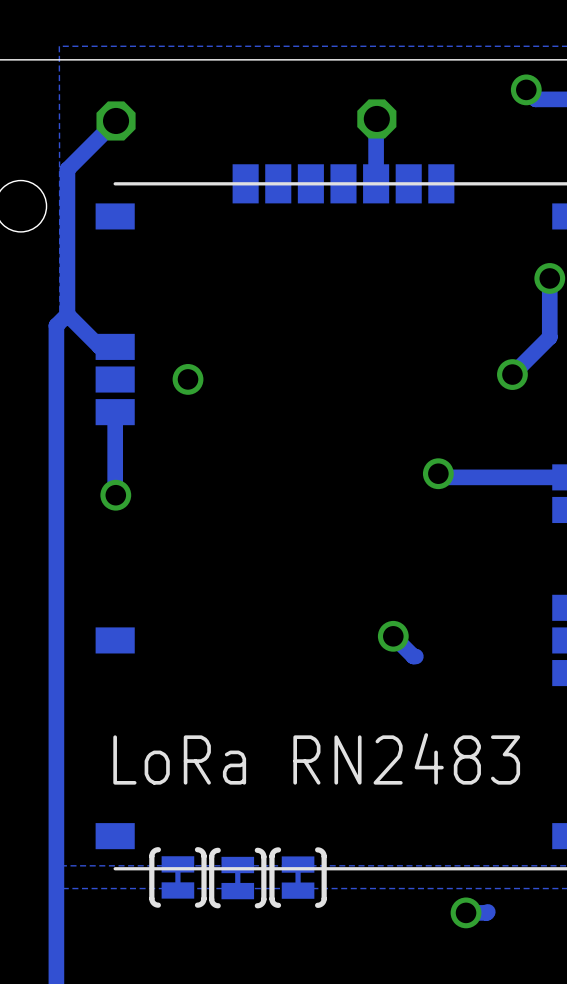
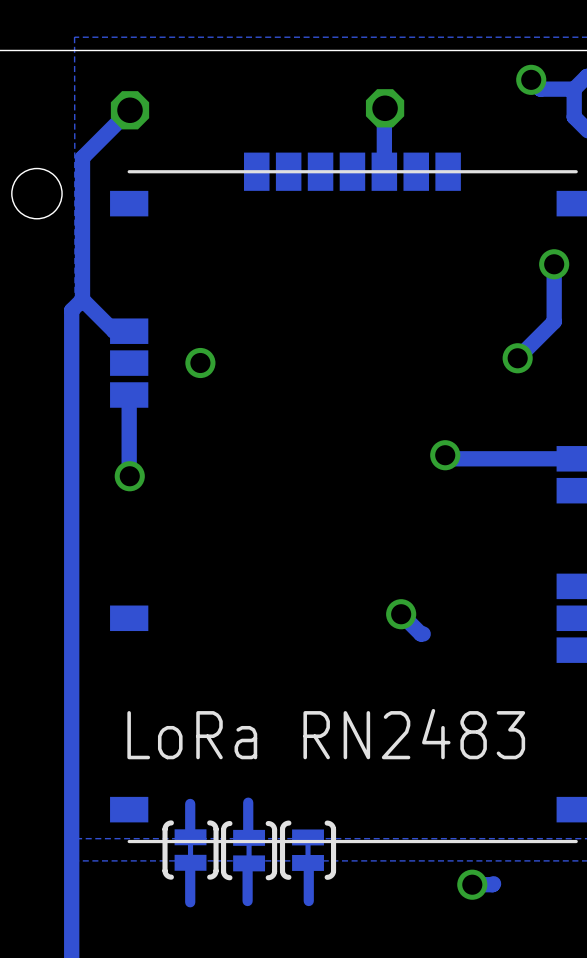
track: none -> (248, 802) (249, 837)
track: none -> (190, 803) (190, 837)
track: none -> (190, 862) (190, 902)
track: none -> (308, 862) (308, 901)
track: none -> (249, 863) (247, 901)

